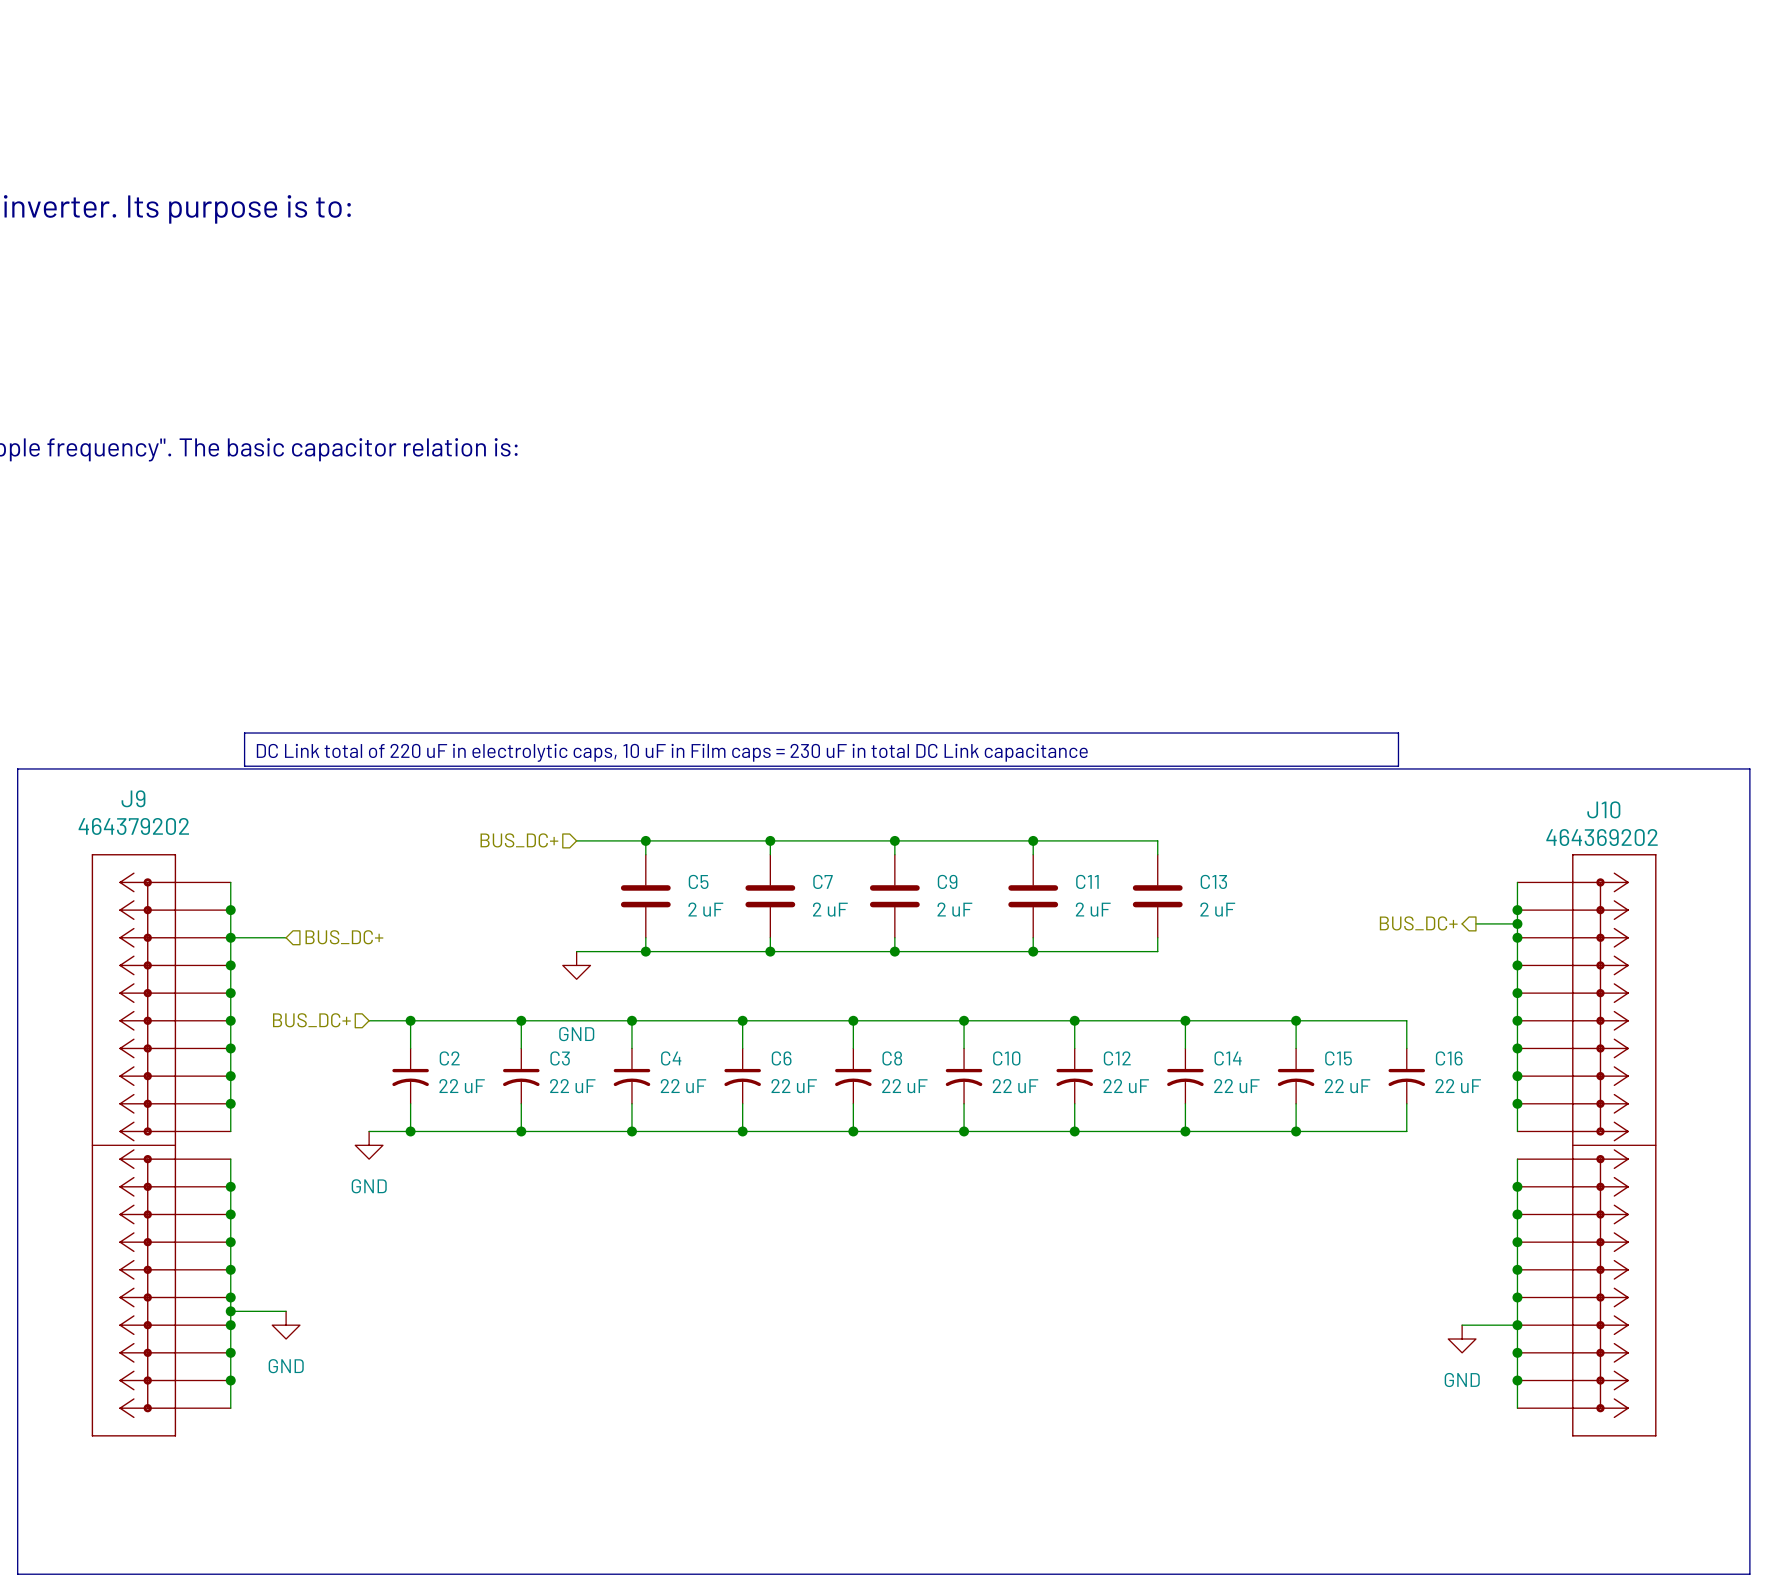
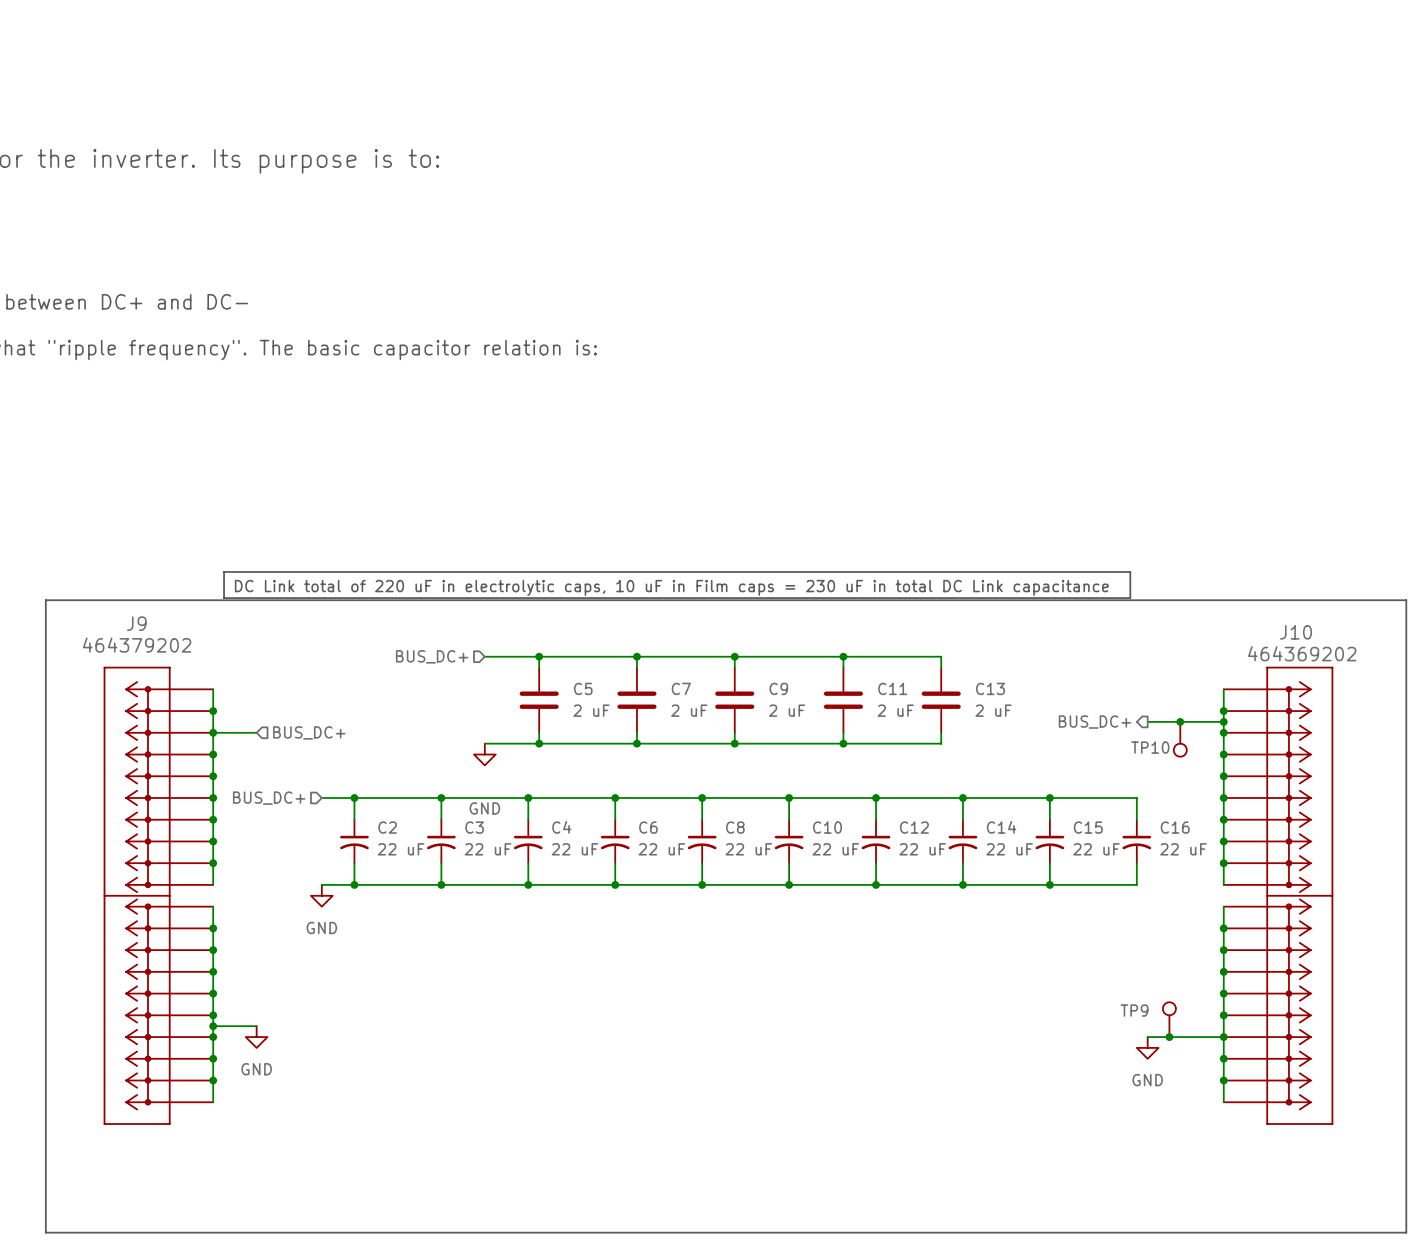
hierarchical label position: BUS_DC+ (1418, 923) -> BUS_DC+ (1095, 722)
wire: none -> (1147, 721) (1191, 721)
junction: none -> (1180, 721)
TP10: none -> (1180, 739)
TP9: none -> (1169, 1019)
wire: none -> (1147, 1037) (1180, 1037)
junction: none -> (1169, 1037)
power symbol position: GND (1462, 1339) -> GND (1147, 1047)

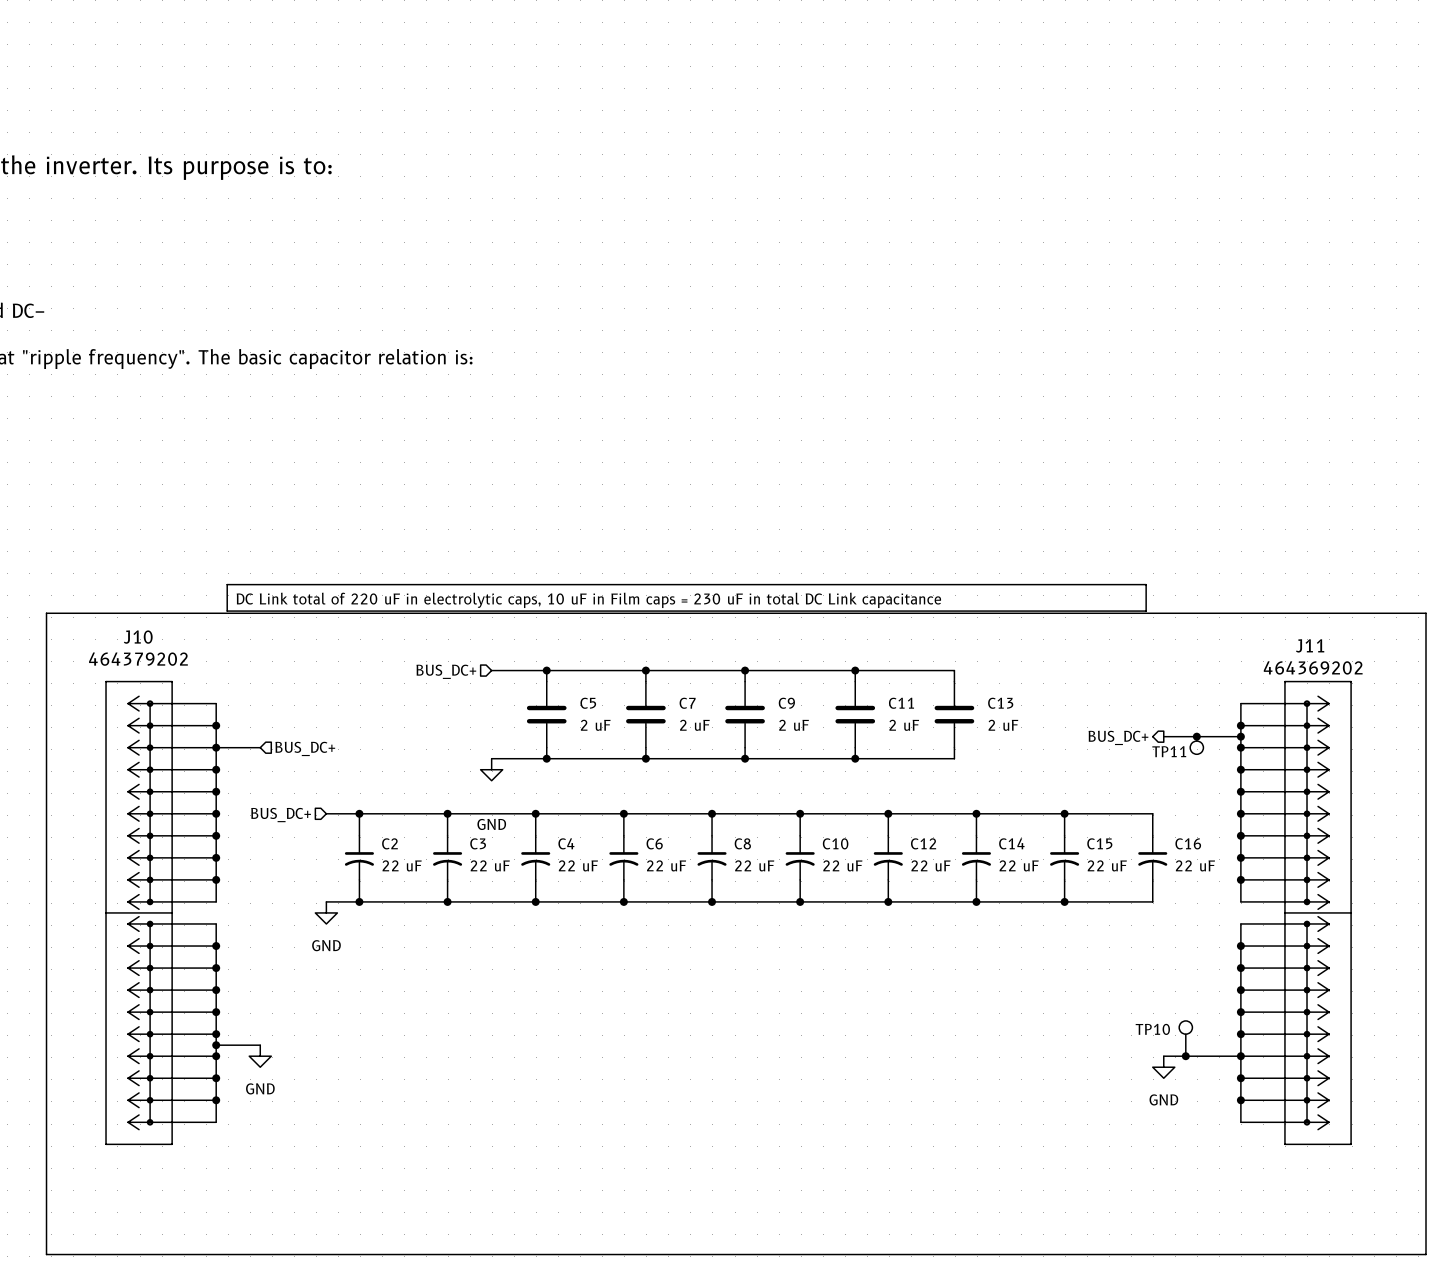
J9 name: J9 (136, 623) -> J10 (138, 637)
J10 name: J10 (1296, 632) -> J11 (1310, 645)
TP11: none -> (1196, 745)
TP10: (1180, 739) -> none
TP9 name: TP9 (1134, 1010) -> TP10 (1152, 1029)

